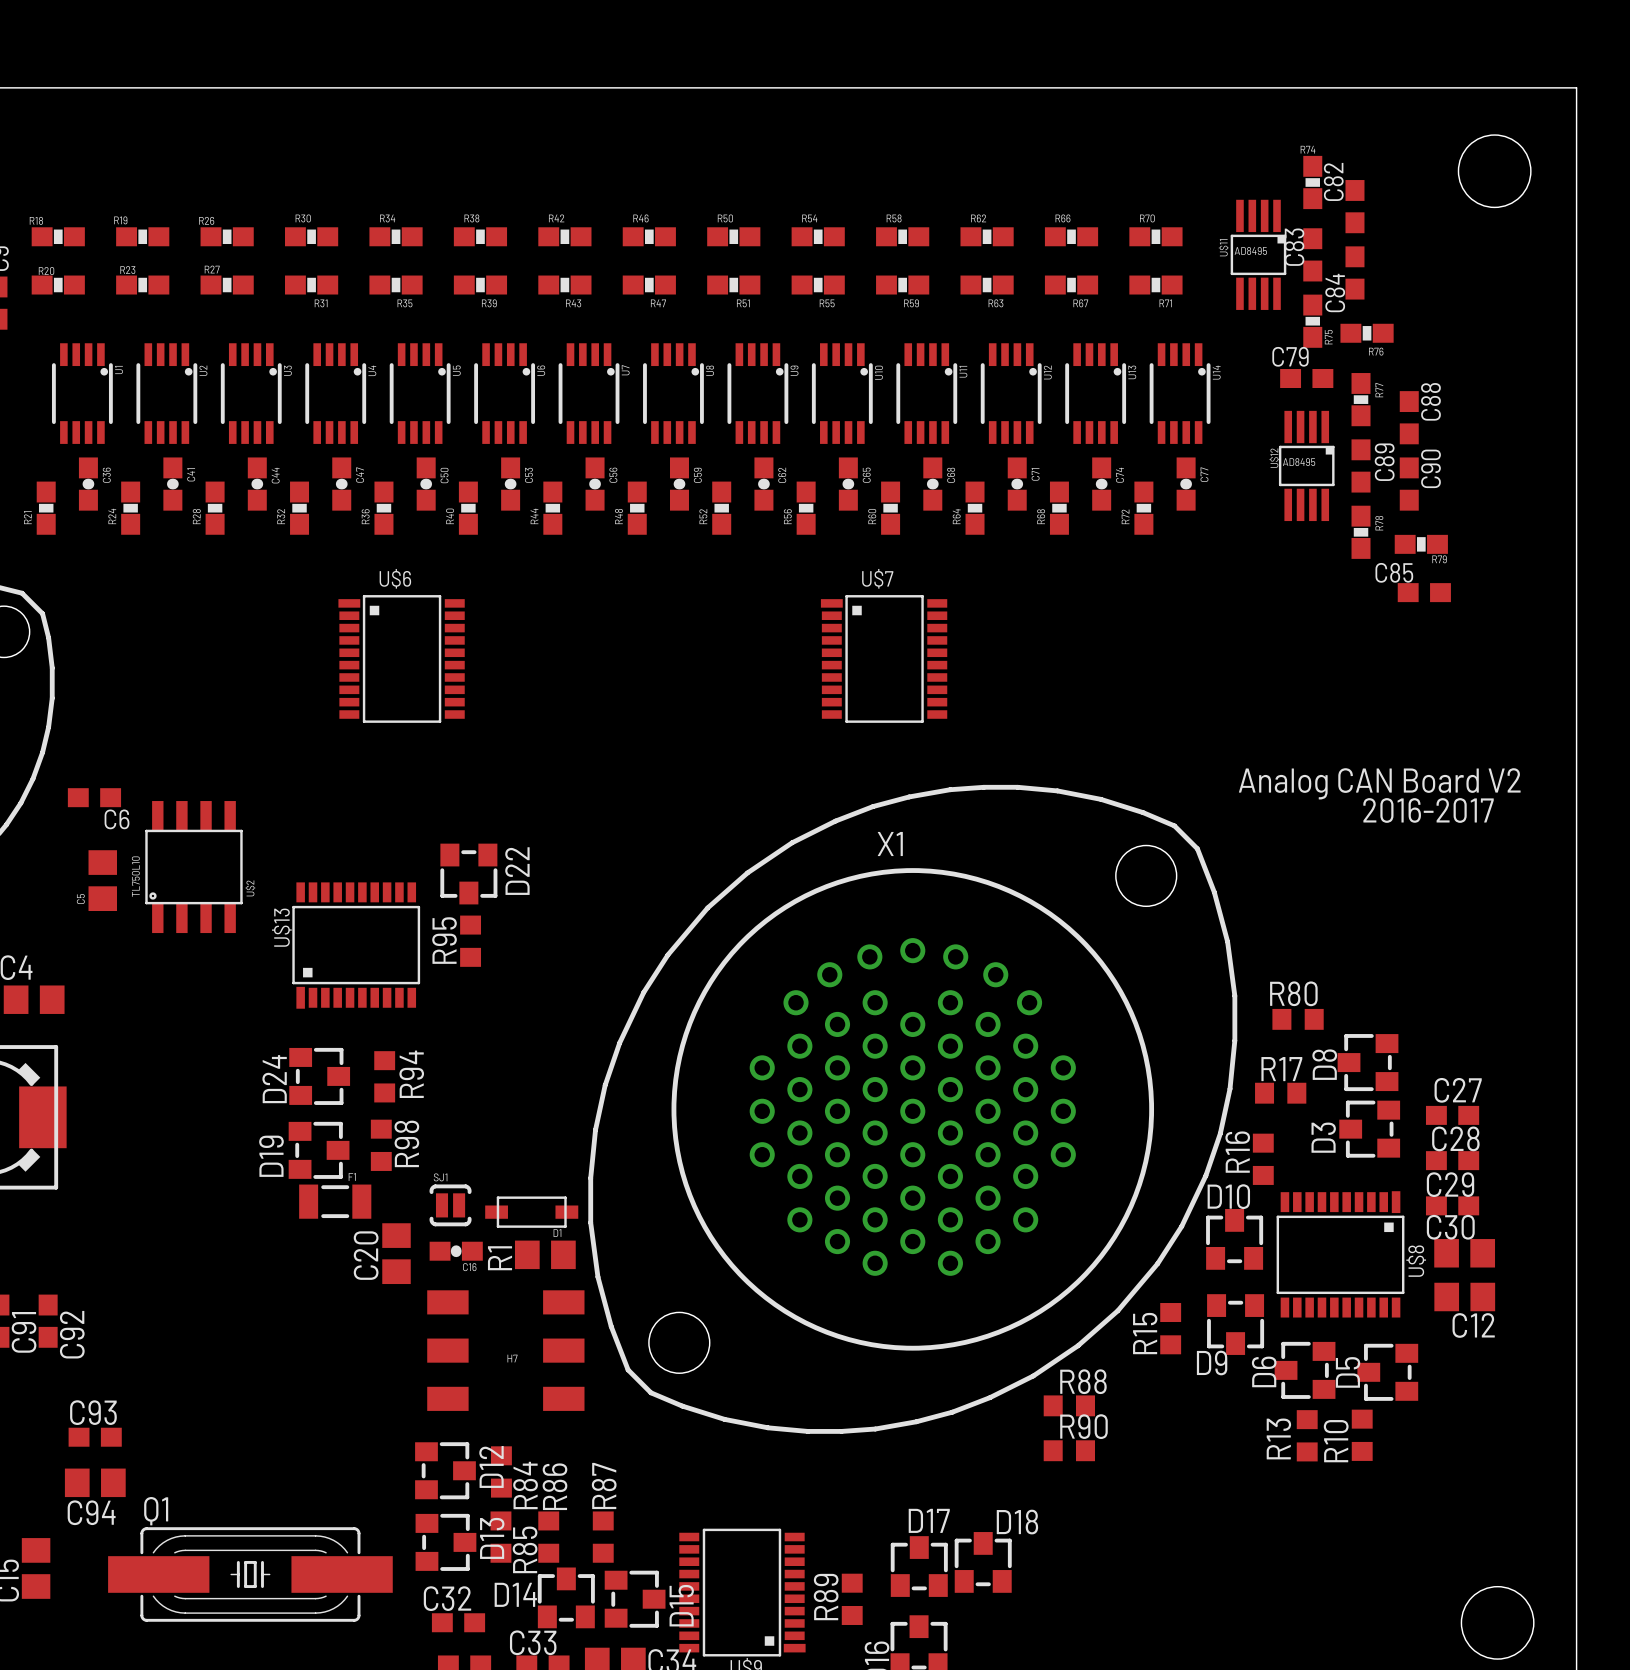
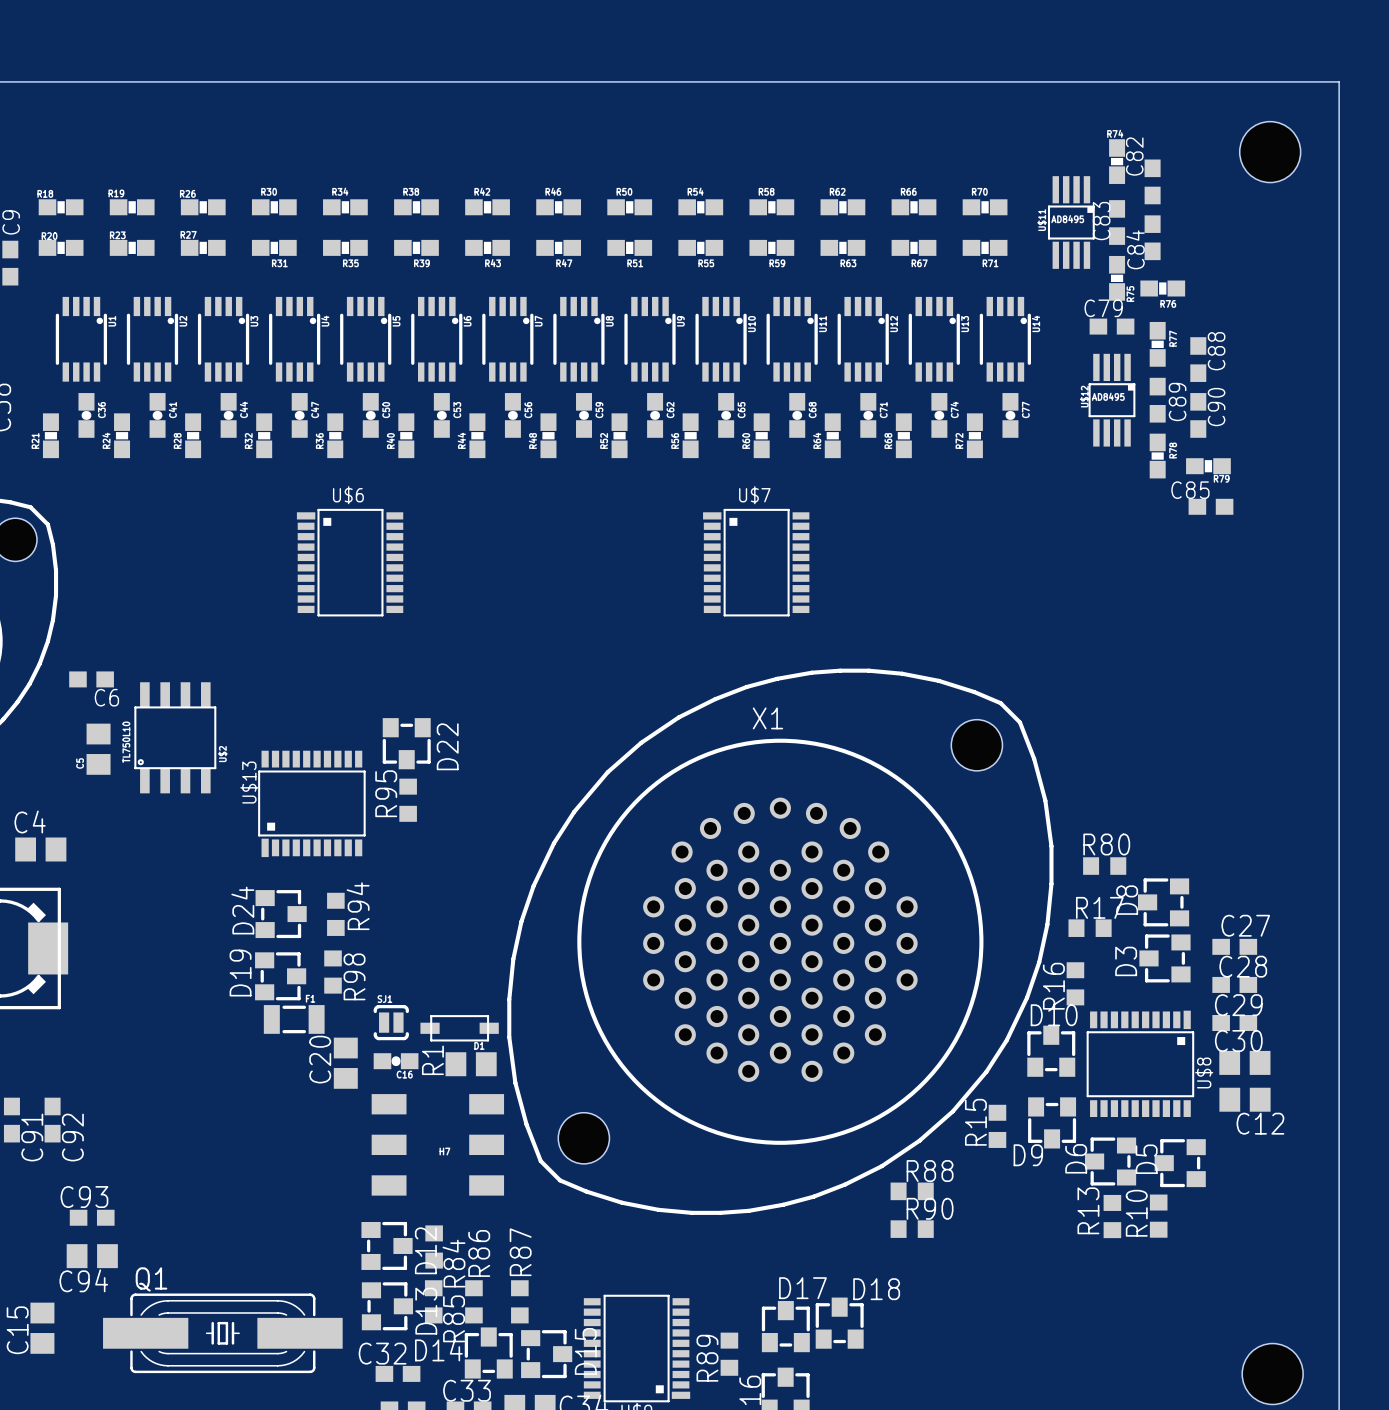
text: Analog CAN Board V2 (1379, 783) -> none
text: 2016-2017 (1428, 810) -> none

